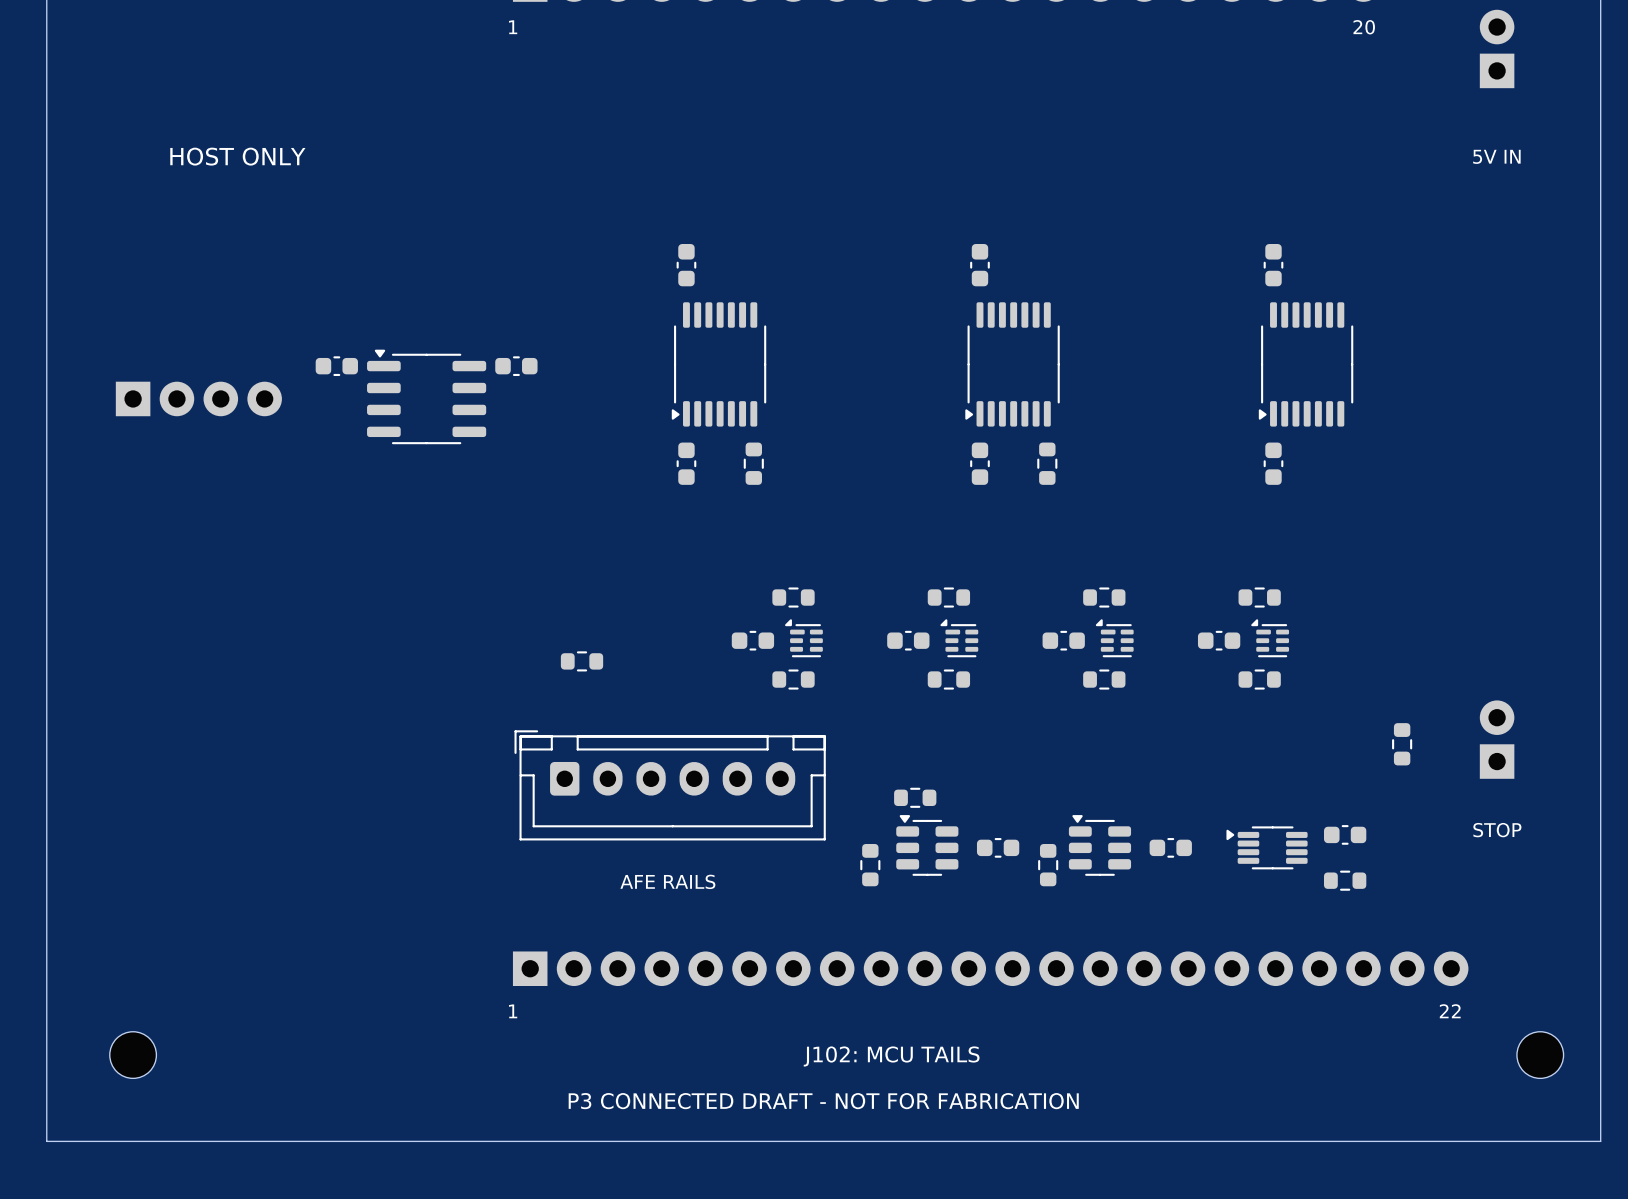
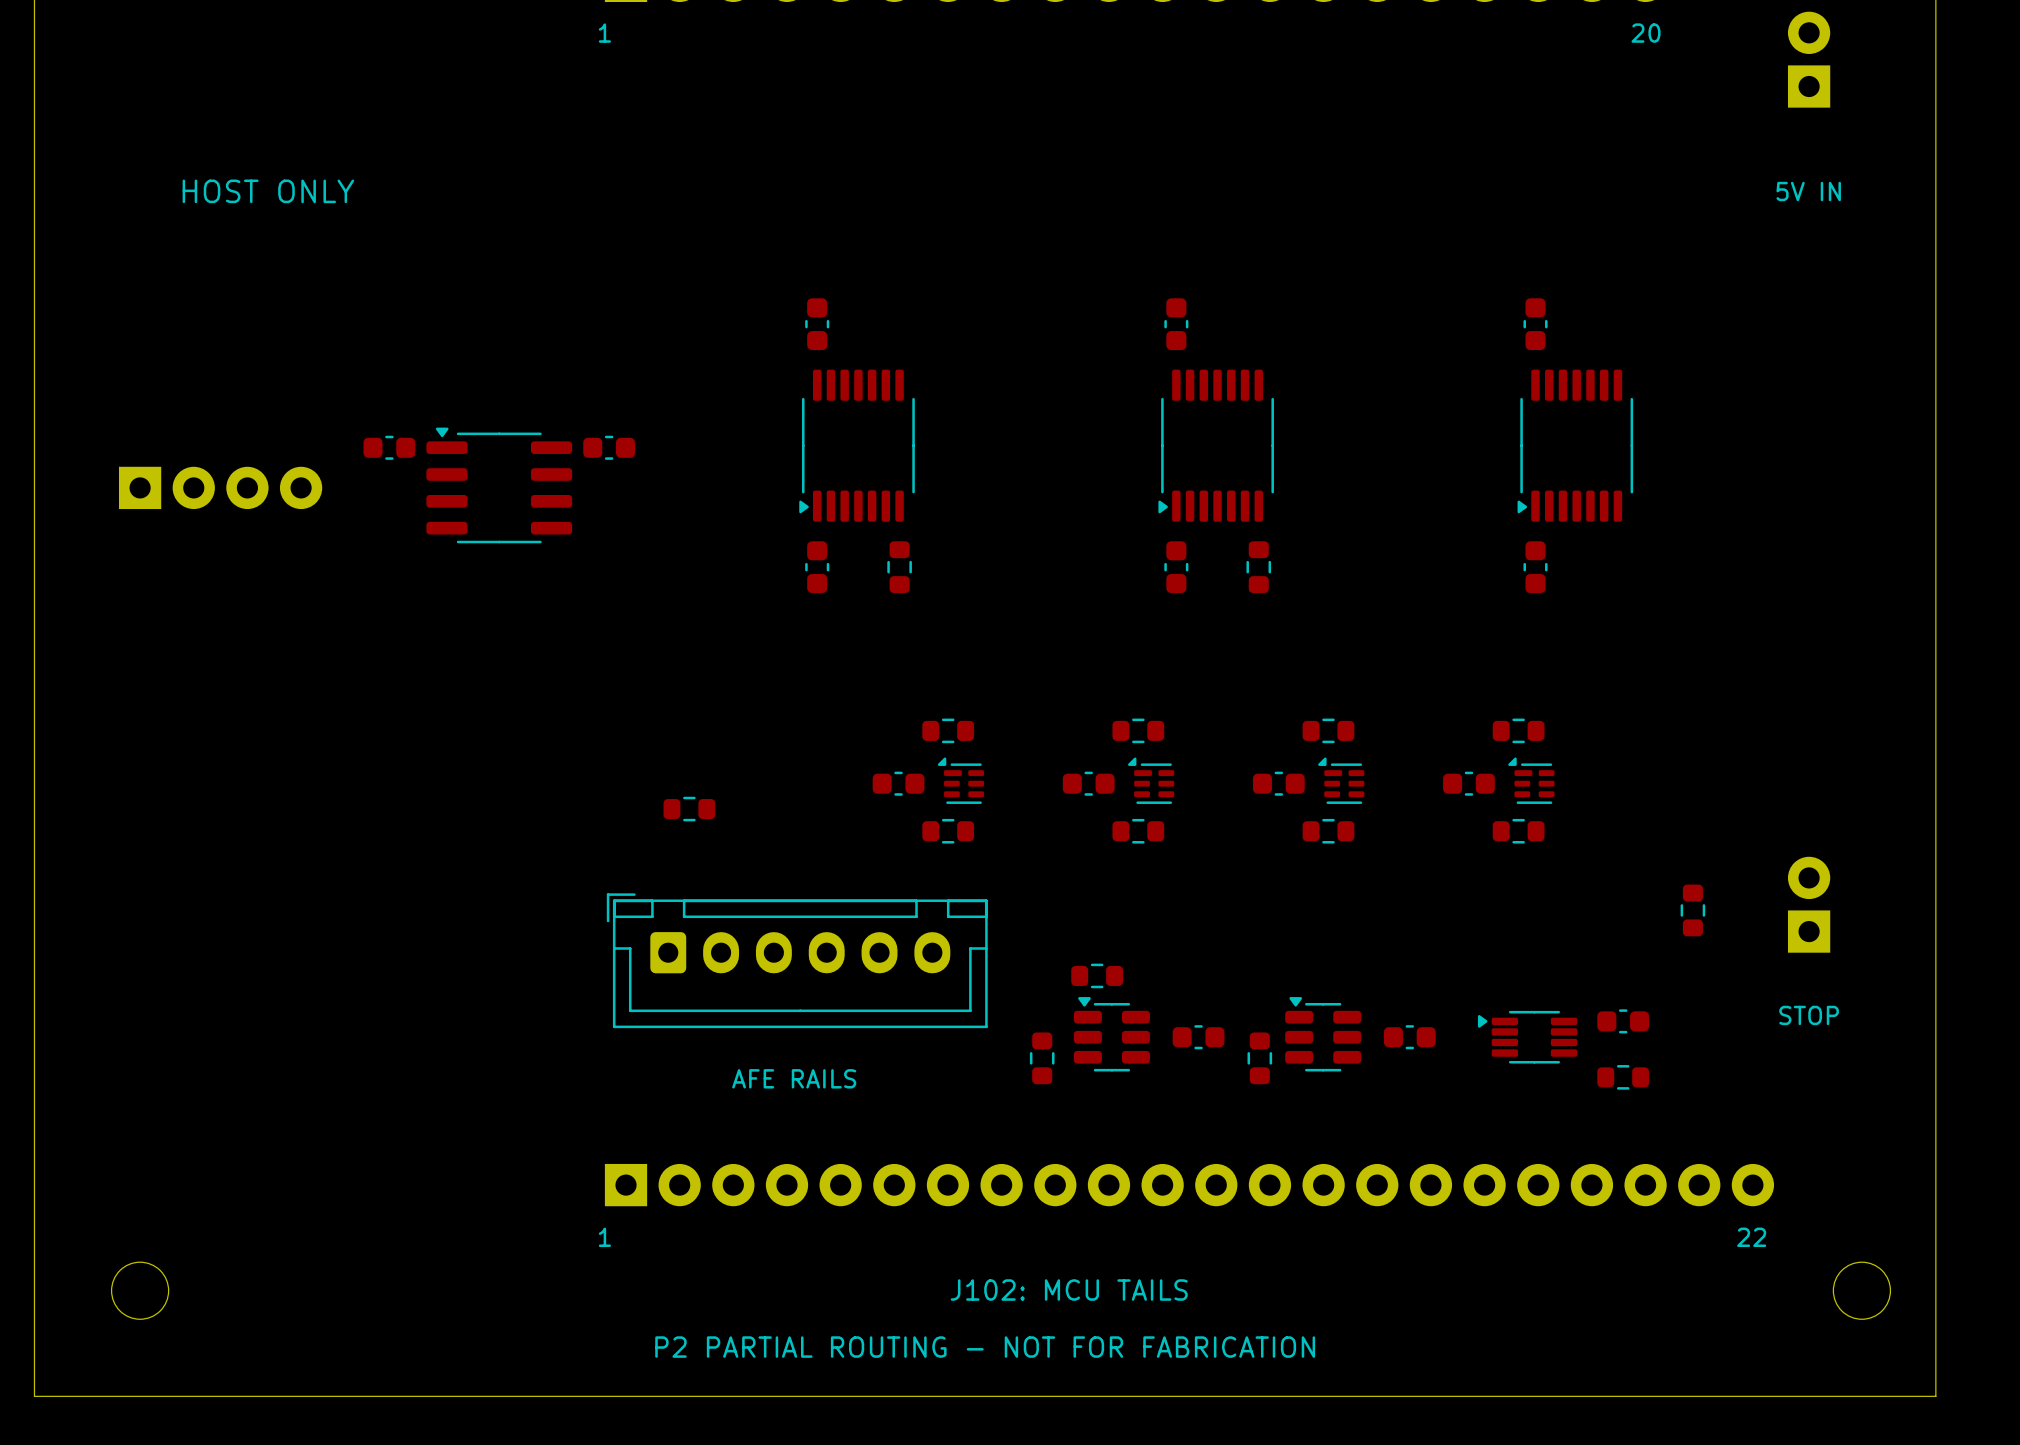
text: P3 CONNECTED DRAFT - NOT FOR FABRICATION (823, 1101) -> P2 PARTIAL ROUTING - NOT FOR FABRICATION (985, 1347)

